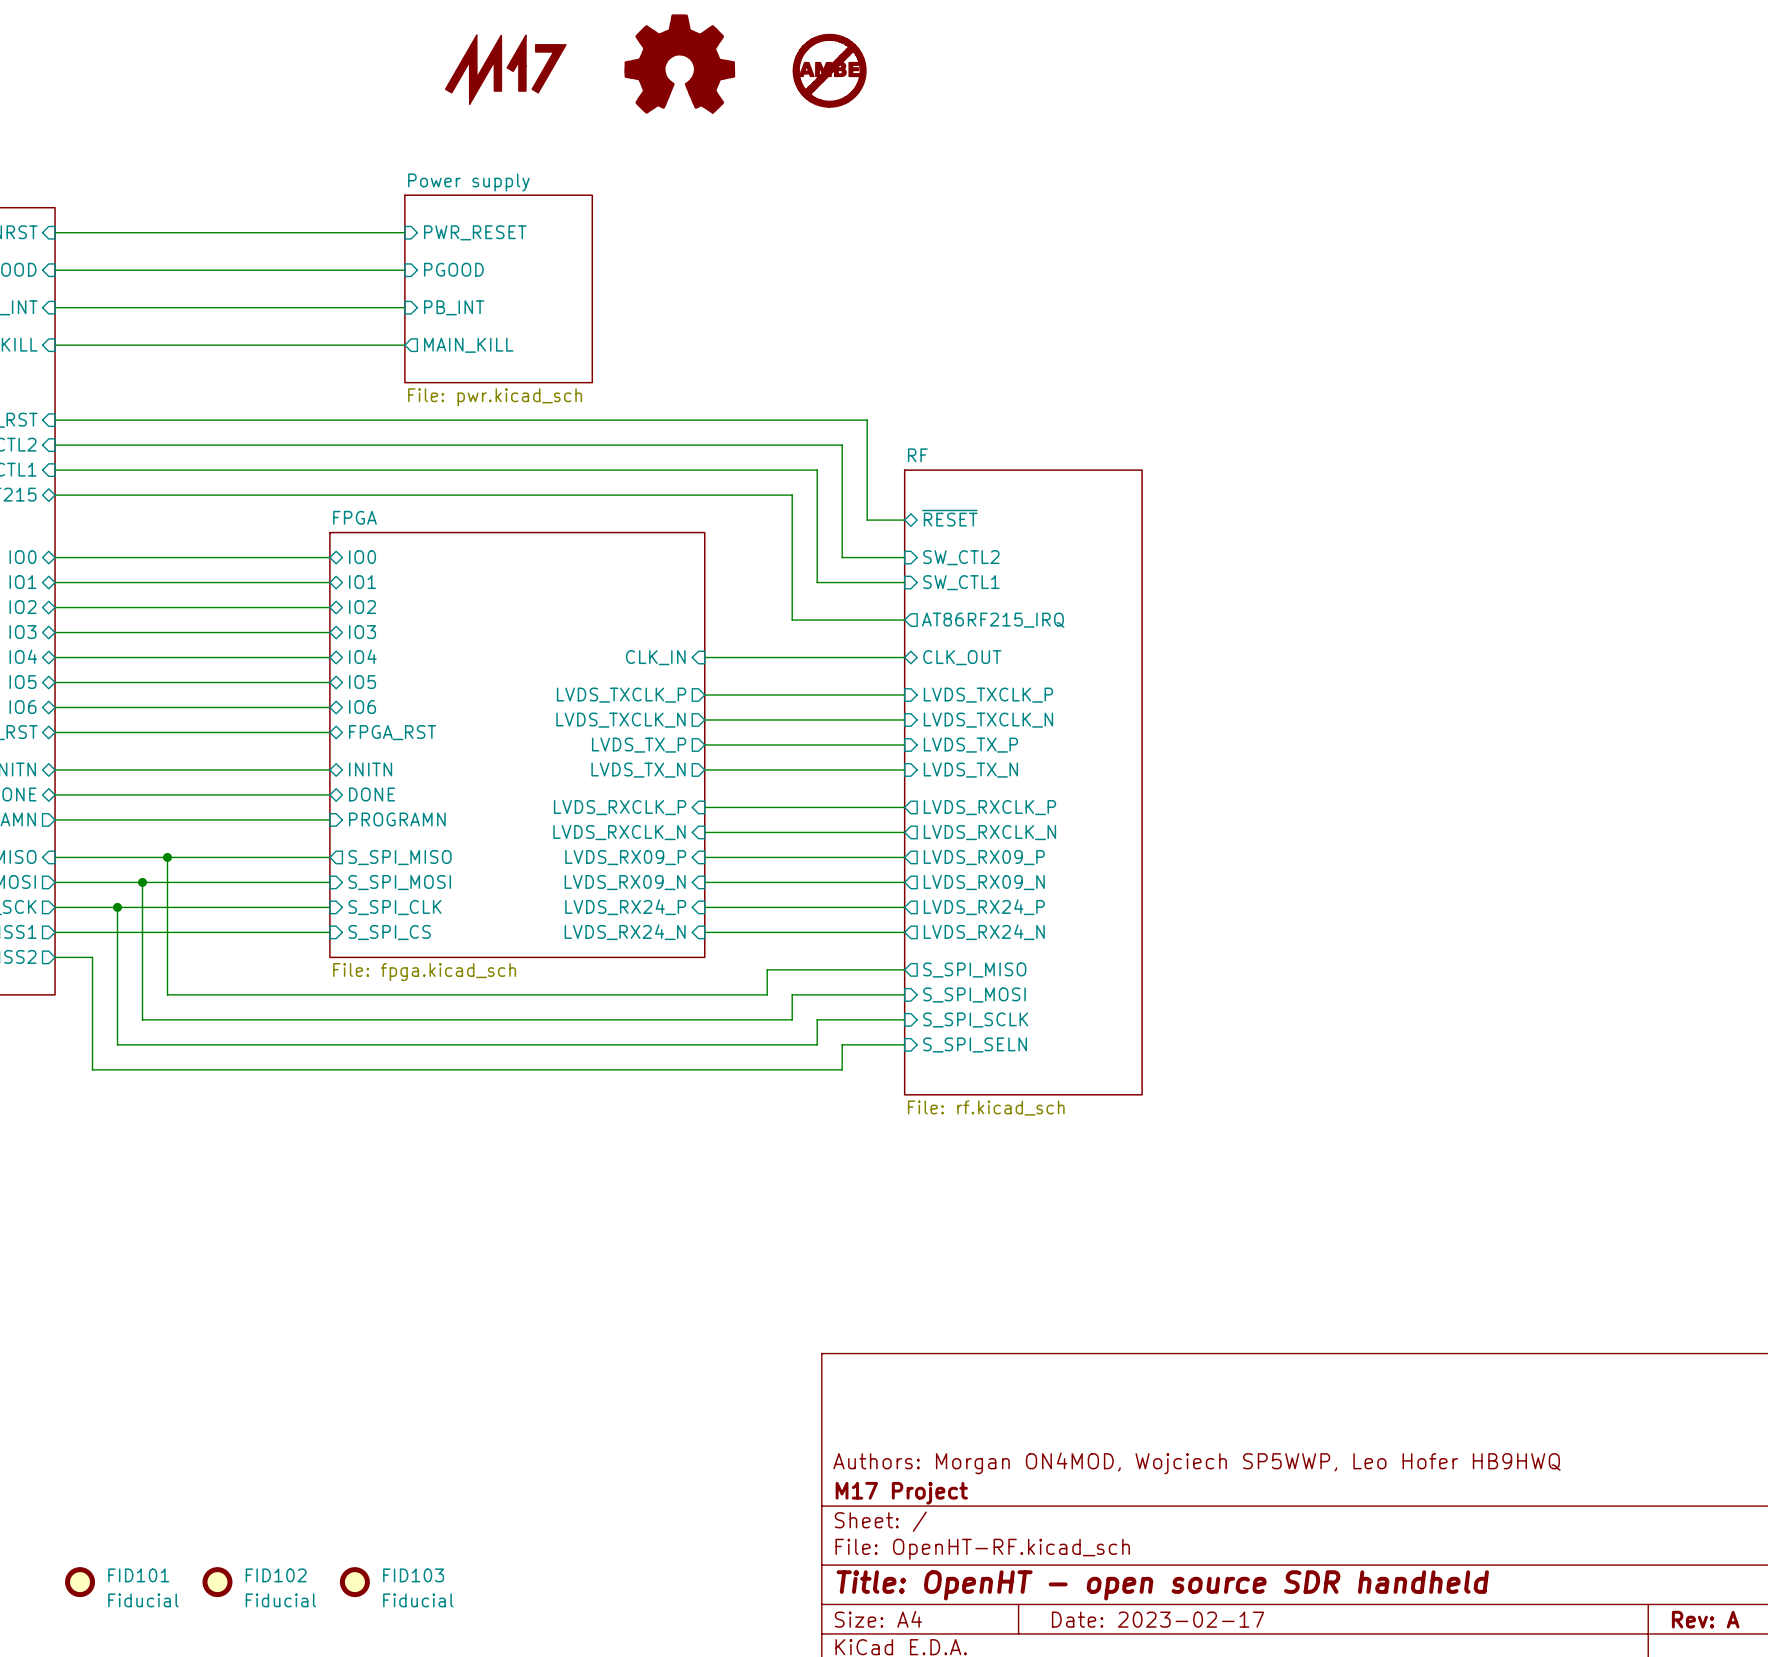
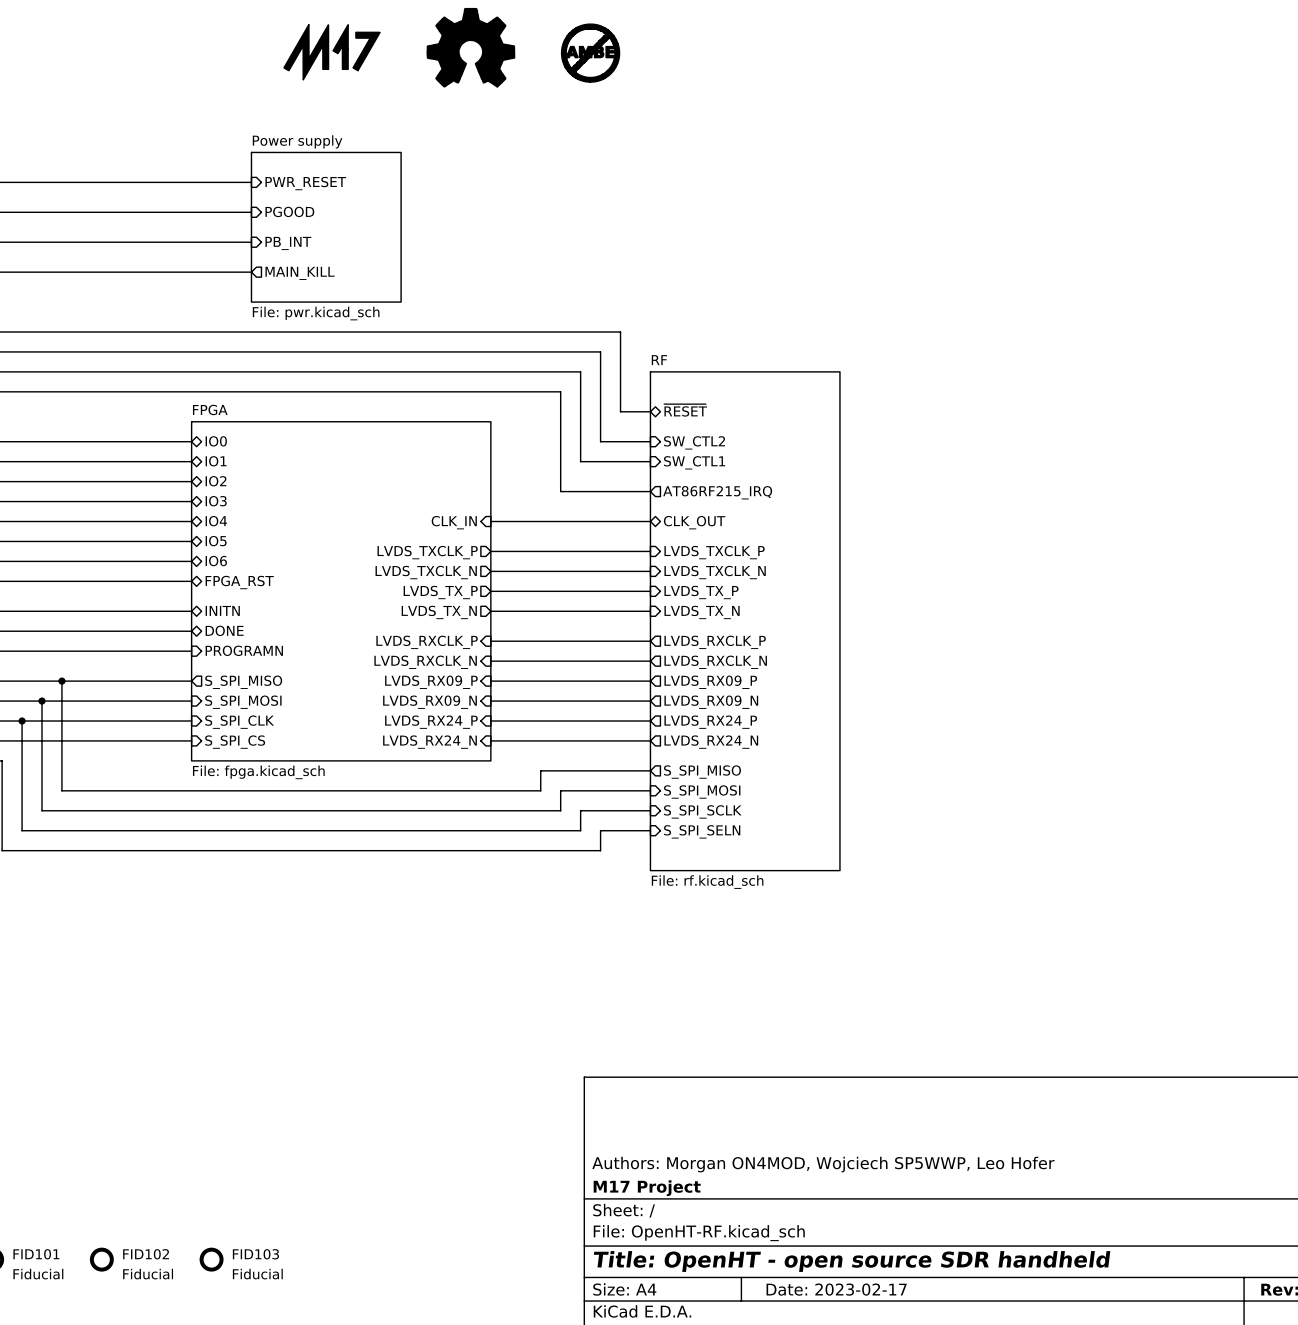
title block: Authors: Morgan ON4MOD, Wojciech SP5WWP, Leo Hofer HB9HWQ (1197, 1463) -> Authors: Morgan ON4MOD, Wojciech SP5WWP, Leo Hofer (823, 1164)

